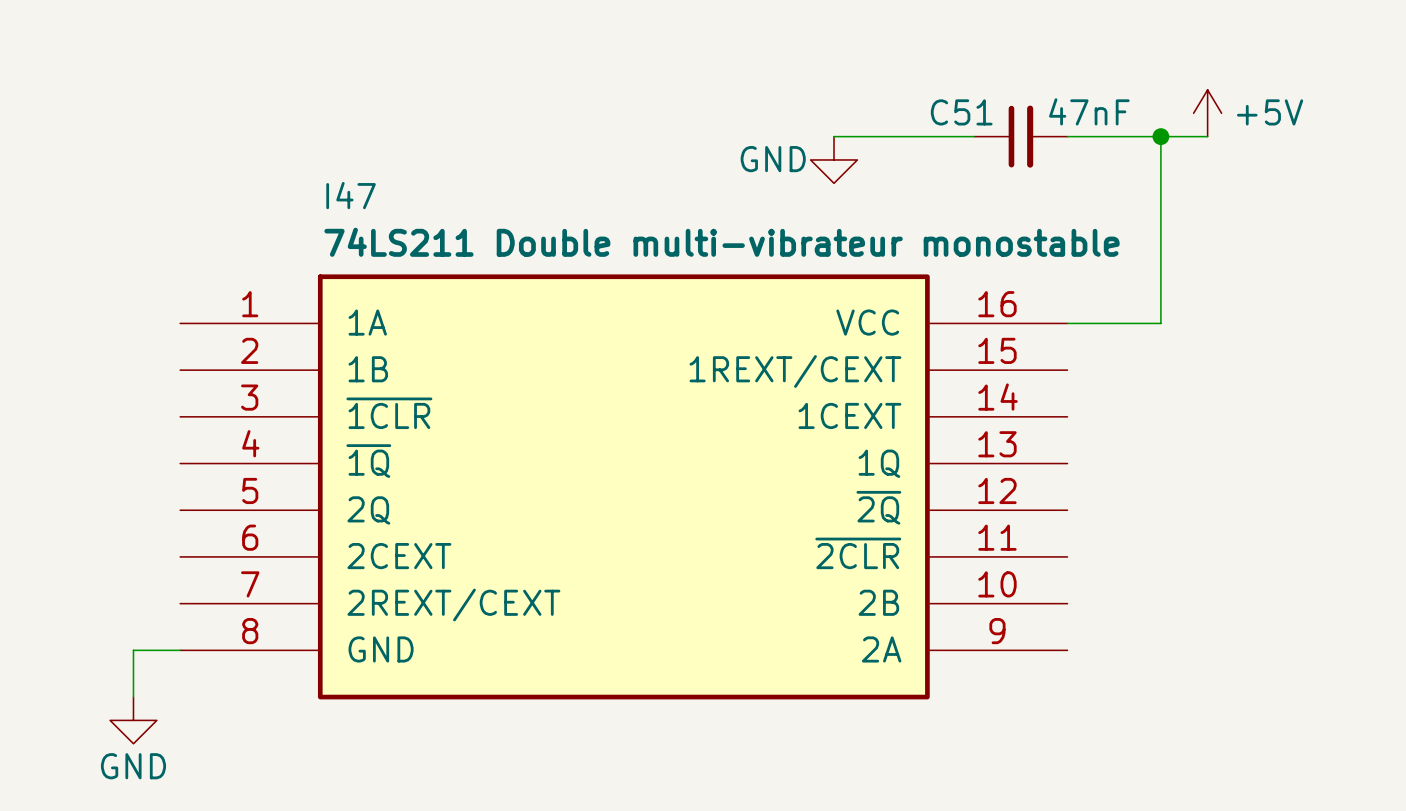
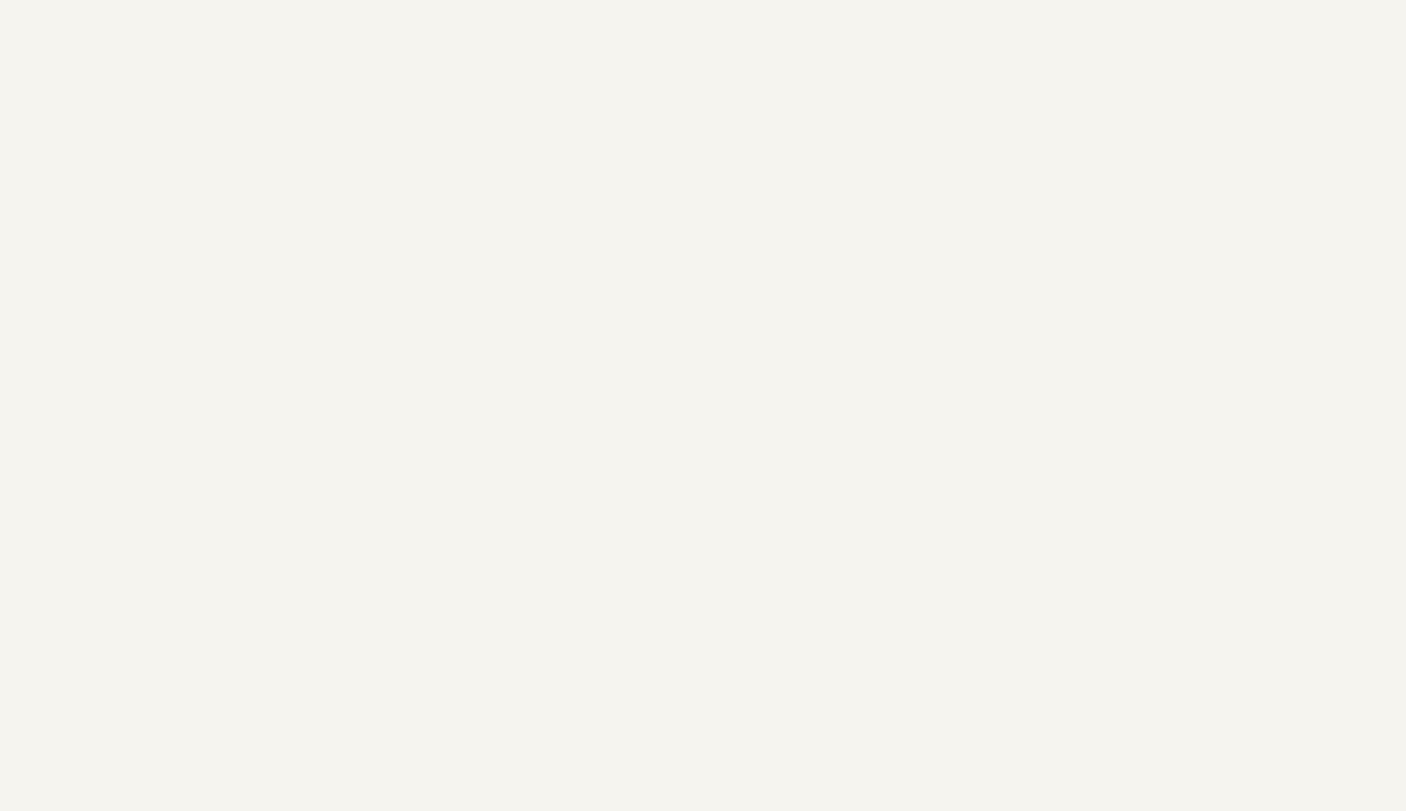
power symbol: +5V (1207, 113) -> none
wire: (834, 136) (974, 136) -> none
C51: 47nF (1020, 136) -> none
wire: (1067, 136) (1207, 136) -> none
wire: (1160, 136) (1160, 323) (1067, 323) -> none
junction: (1160, 136) -> none
power symbol: GND (834, 159) -> none
I47: 74LS211 Double multi-vibrateur monostable (623, 486) -> none
wire: (180, 650) (133, 650) (133, 697) -> none
power symbol: GND (133, 720) -> none

